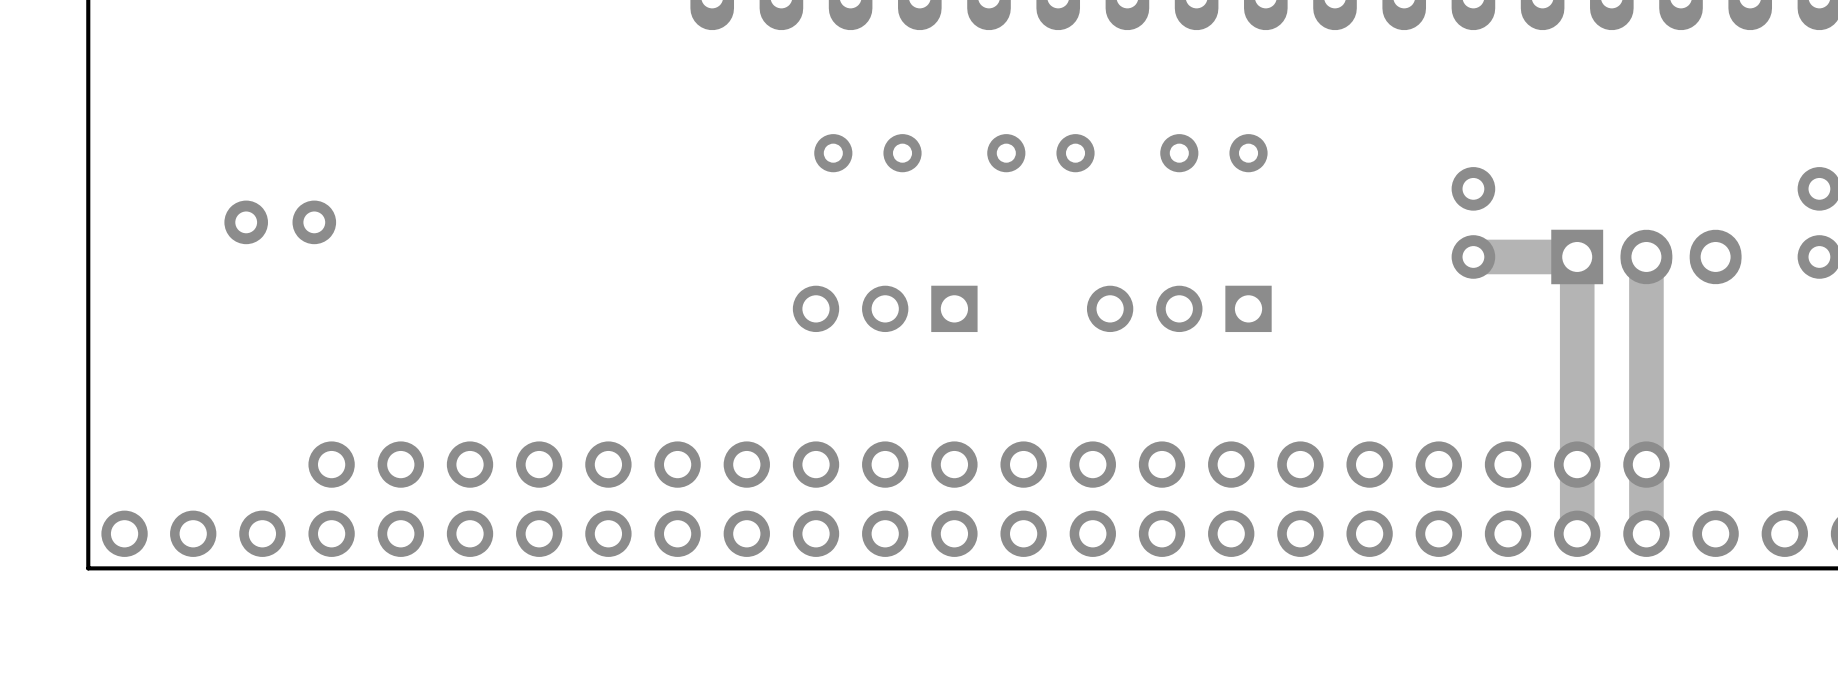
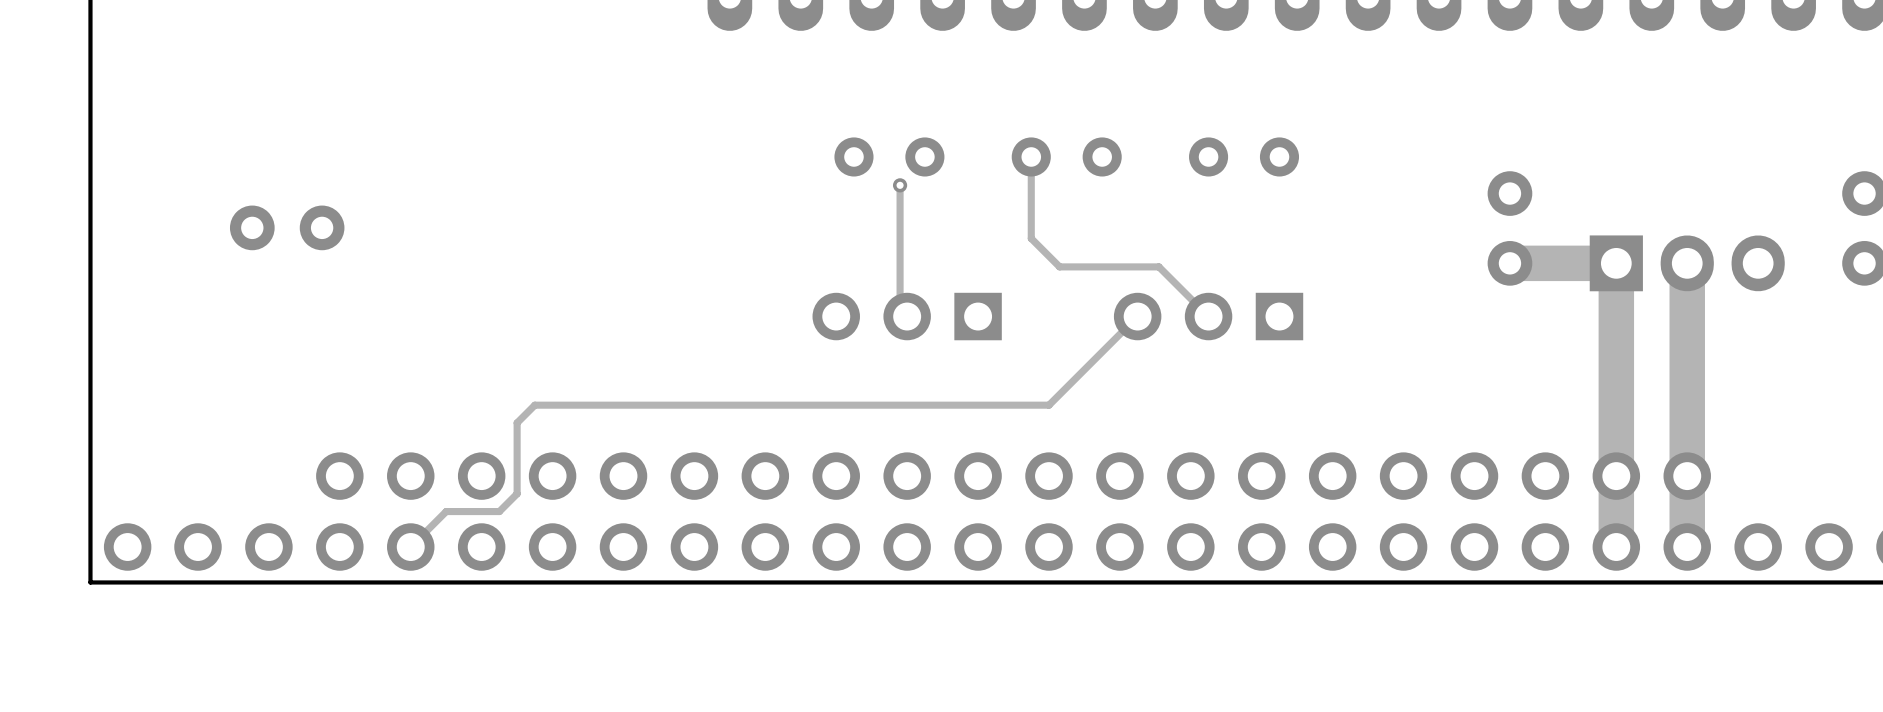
track: none -> (1031, 156) (1031, 238) (1059, 266) (1158, 266) (1208, 316)
track: none -> (900, 185) (900, 312) (907, 320)
via: none -> (900, 185)
track: none -> (1137, 316) (1049, 405) (534, 405) (517, 422) (517, 493) (499, 511) (446, 511) (410, 547)

